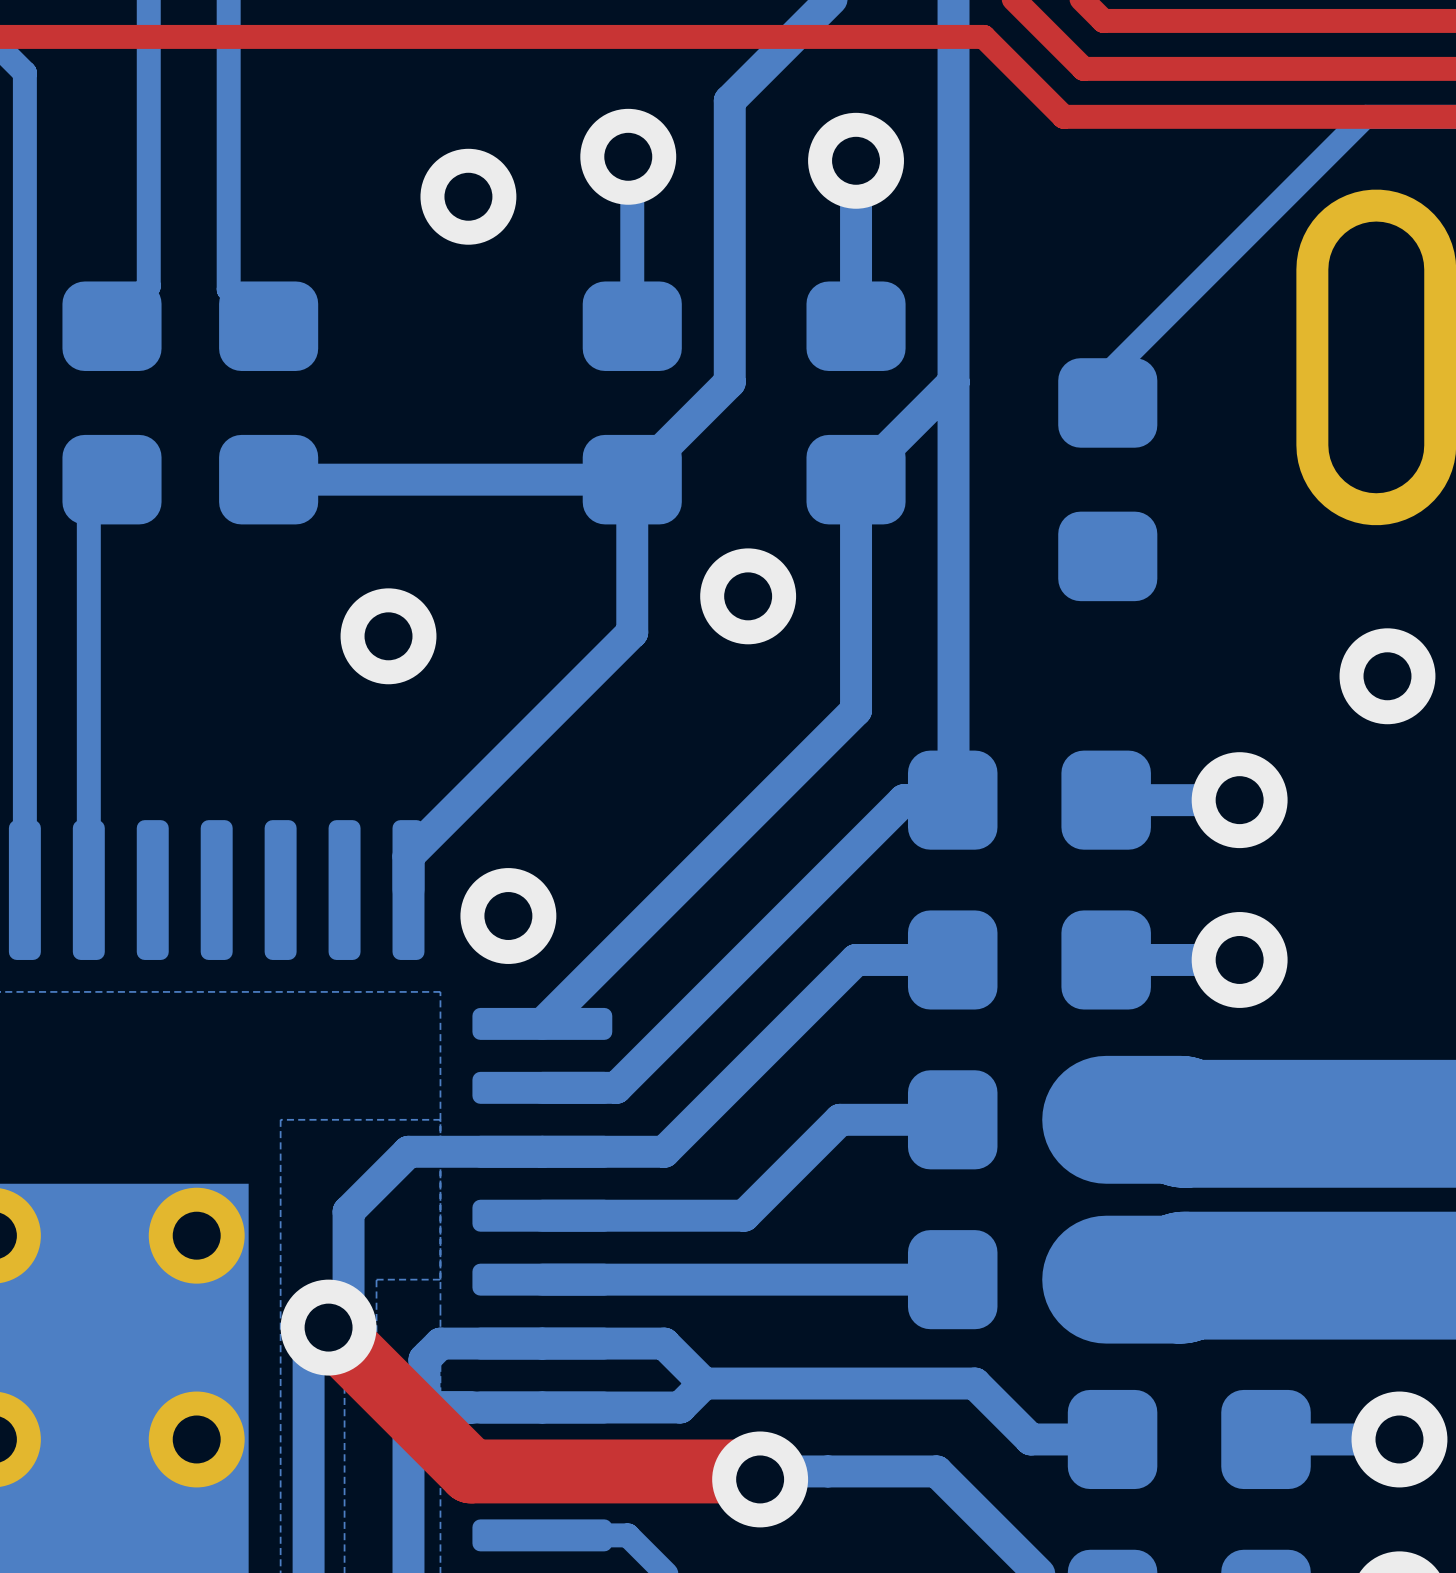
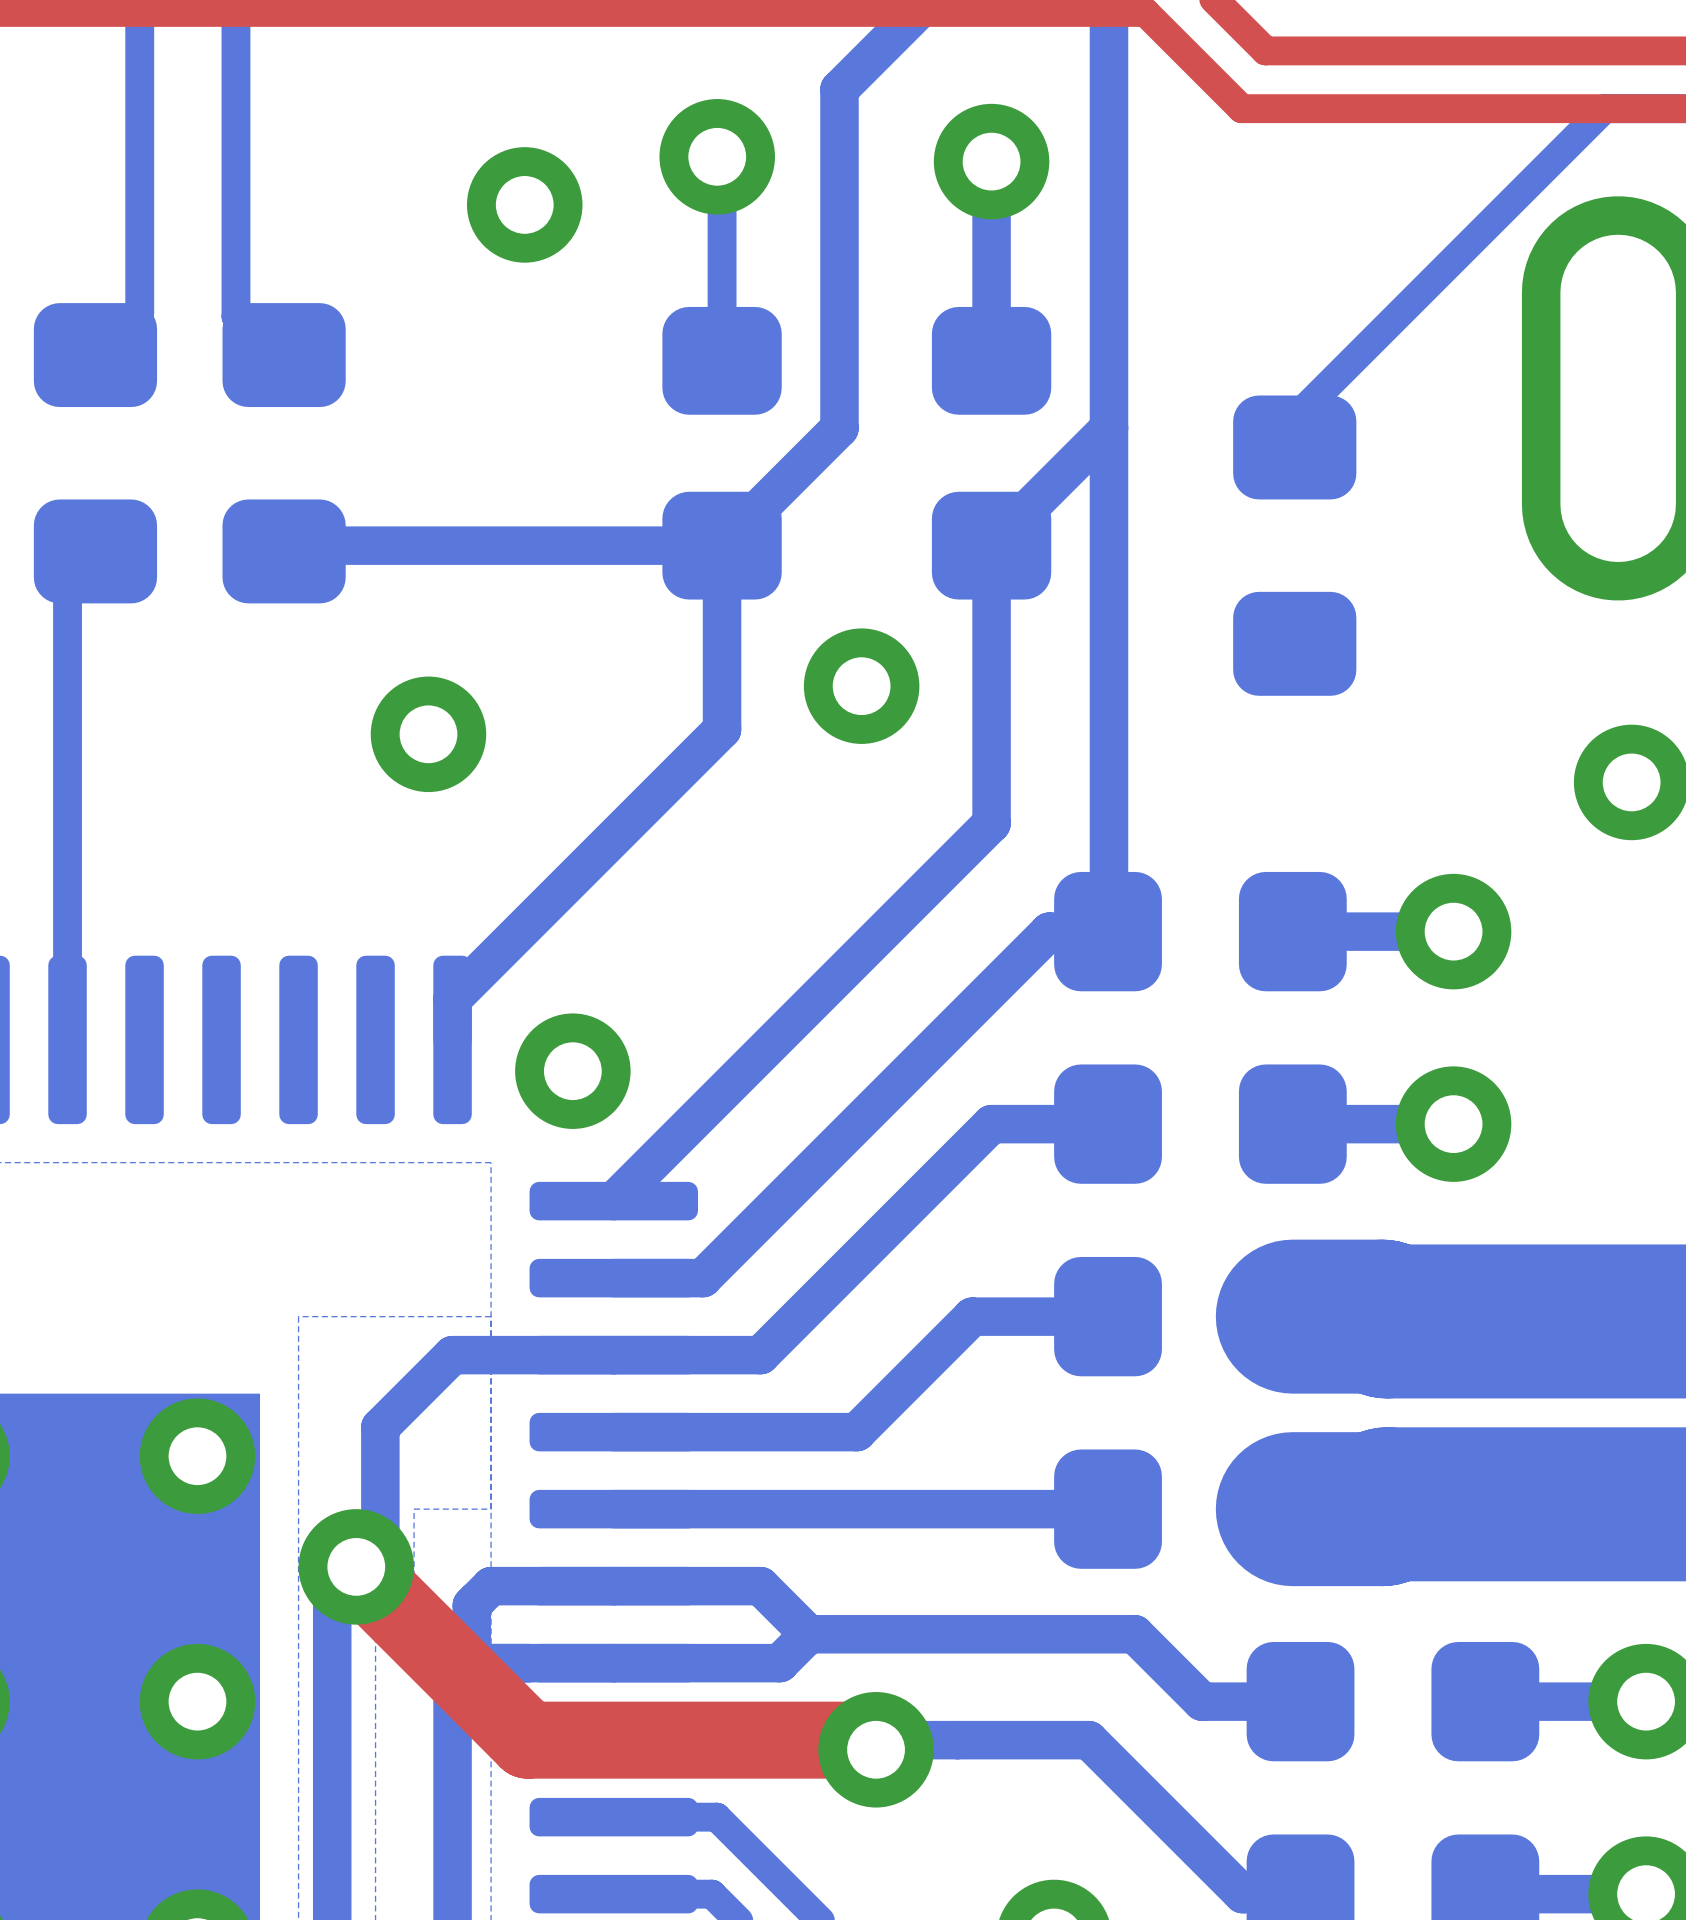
part footprint: [62, 281, 162, 525] -> [33, 303, 158, 604]
part footprint: [219, 281, 319, 525] -> [222, 303, 346, 604]
part footprint: [1058, 358, 1158, 602] -> [1233, 395, 1357, 696]

